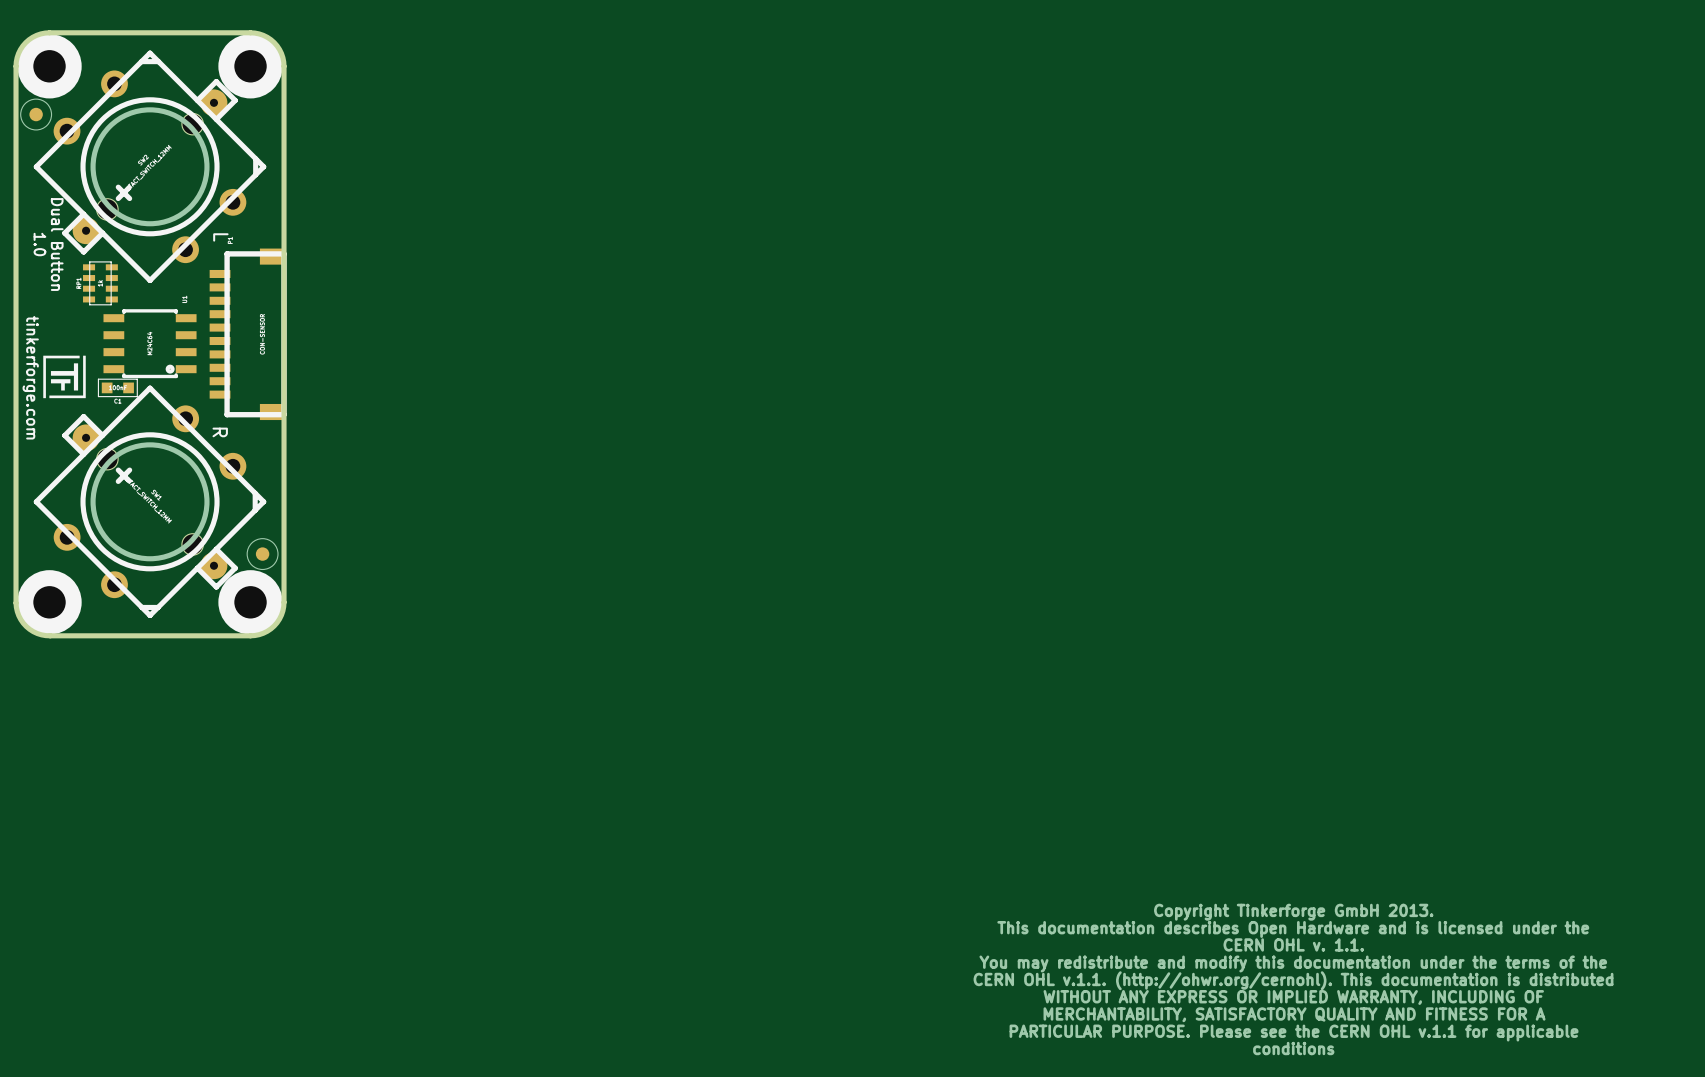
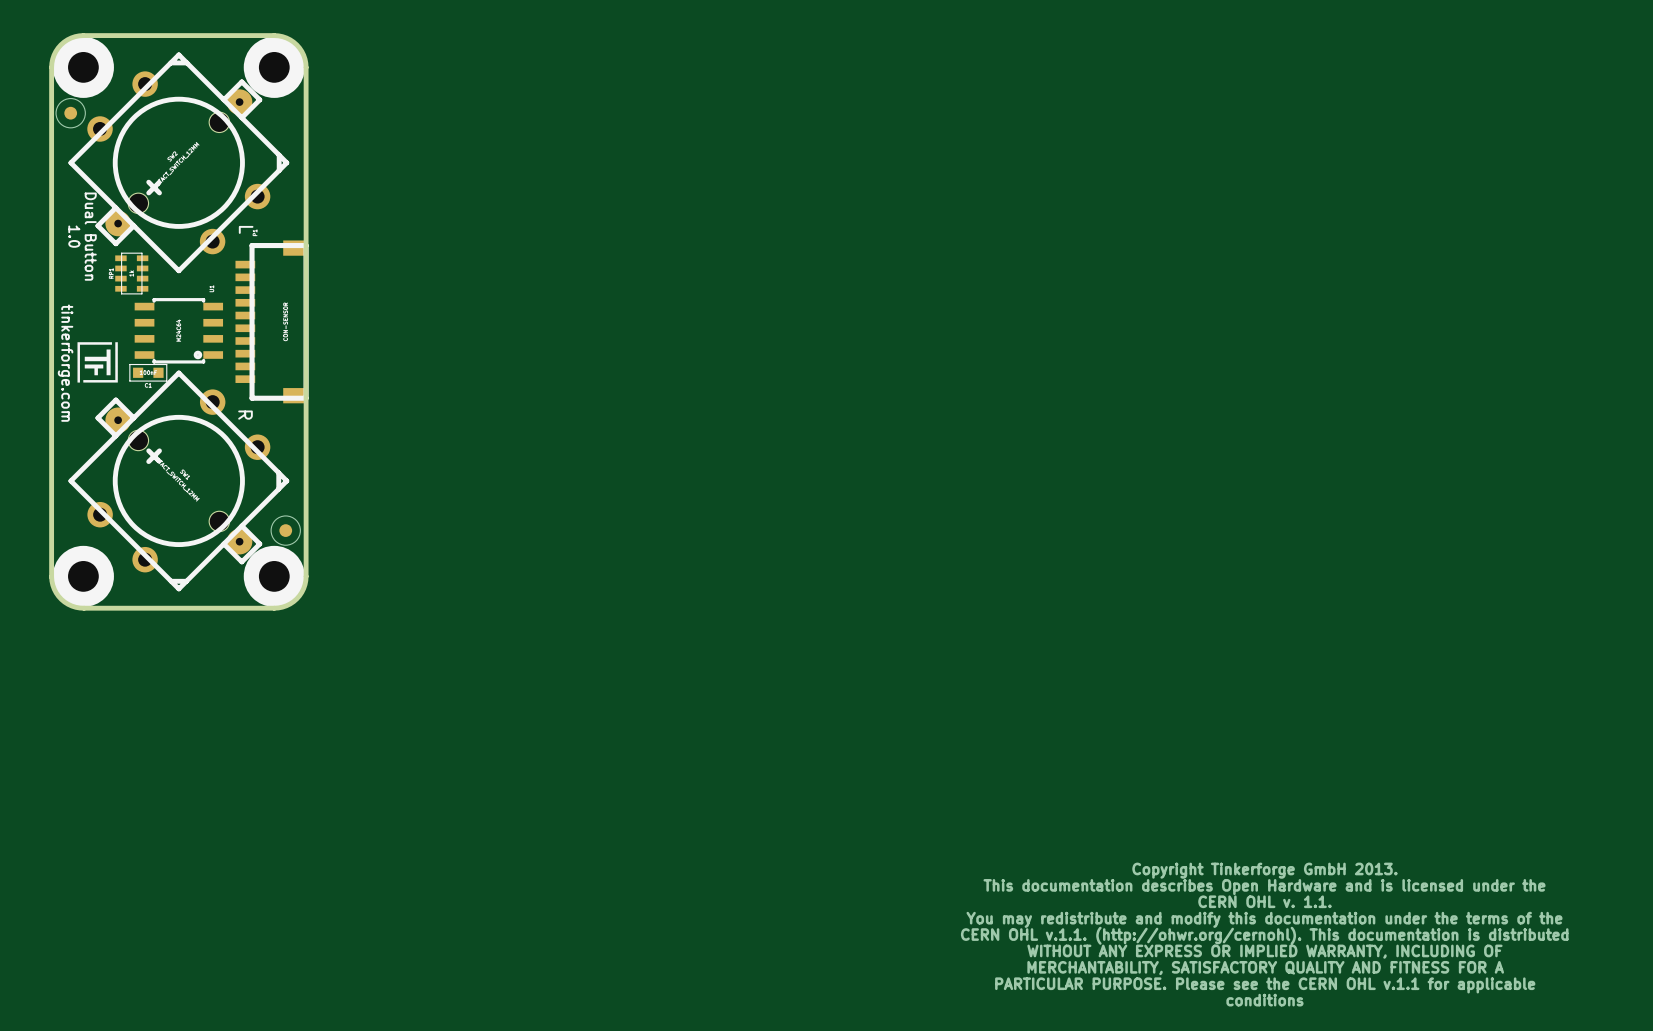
drawing: [90, 107, 210, 227] -> none
drawing: [90, 442, 210, 562] -> none

